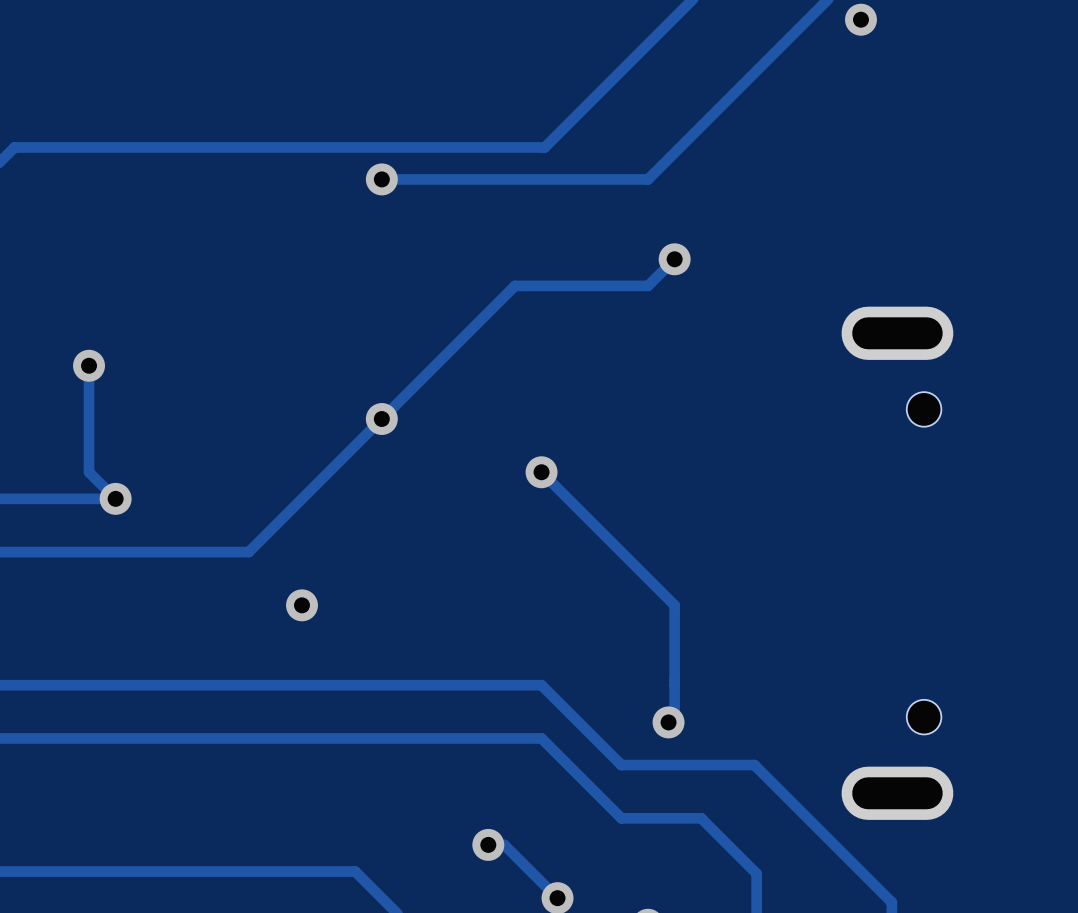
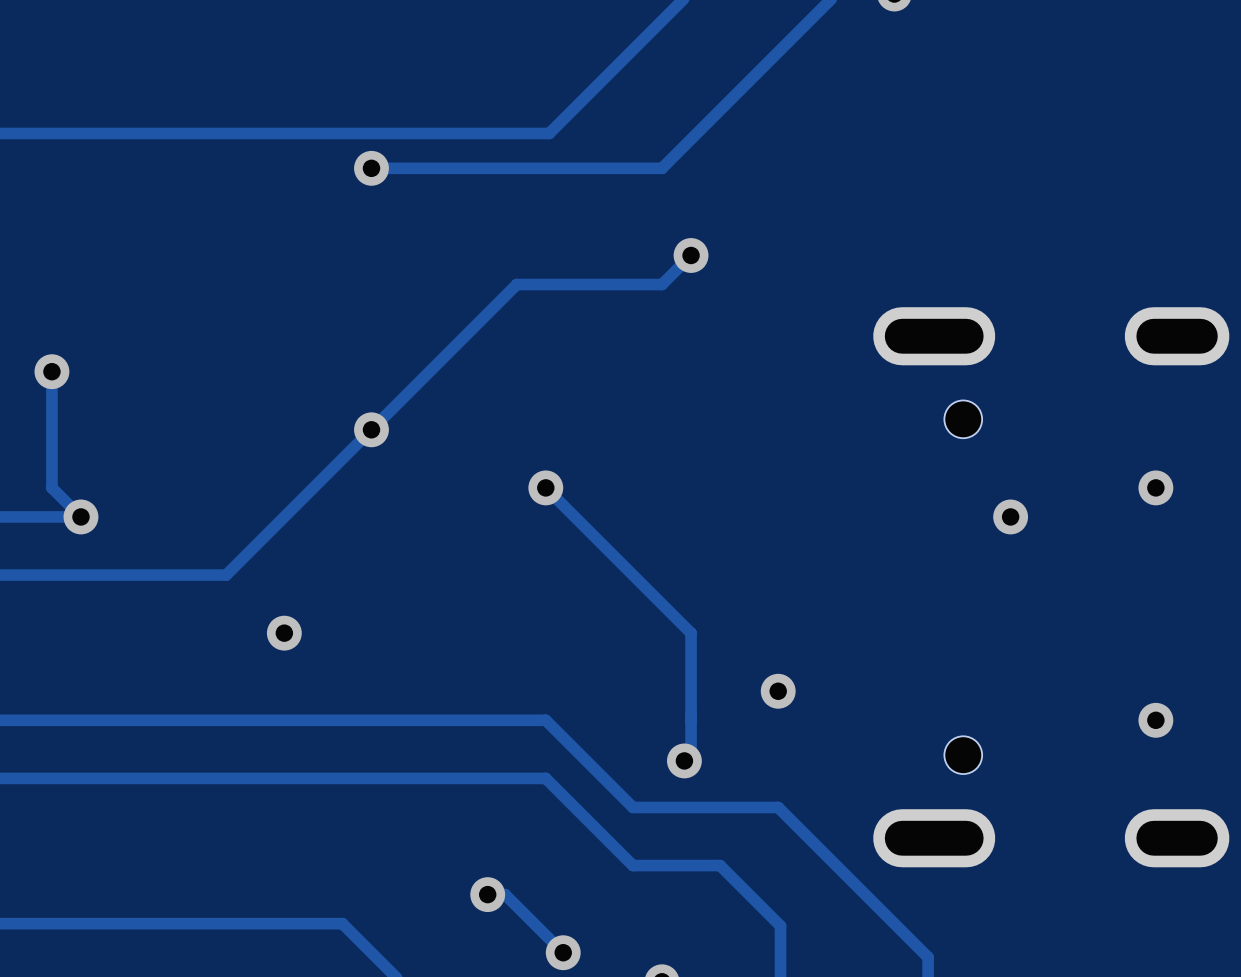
via: none -> (1010, 516)
via: none -> (778, 691)

